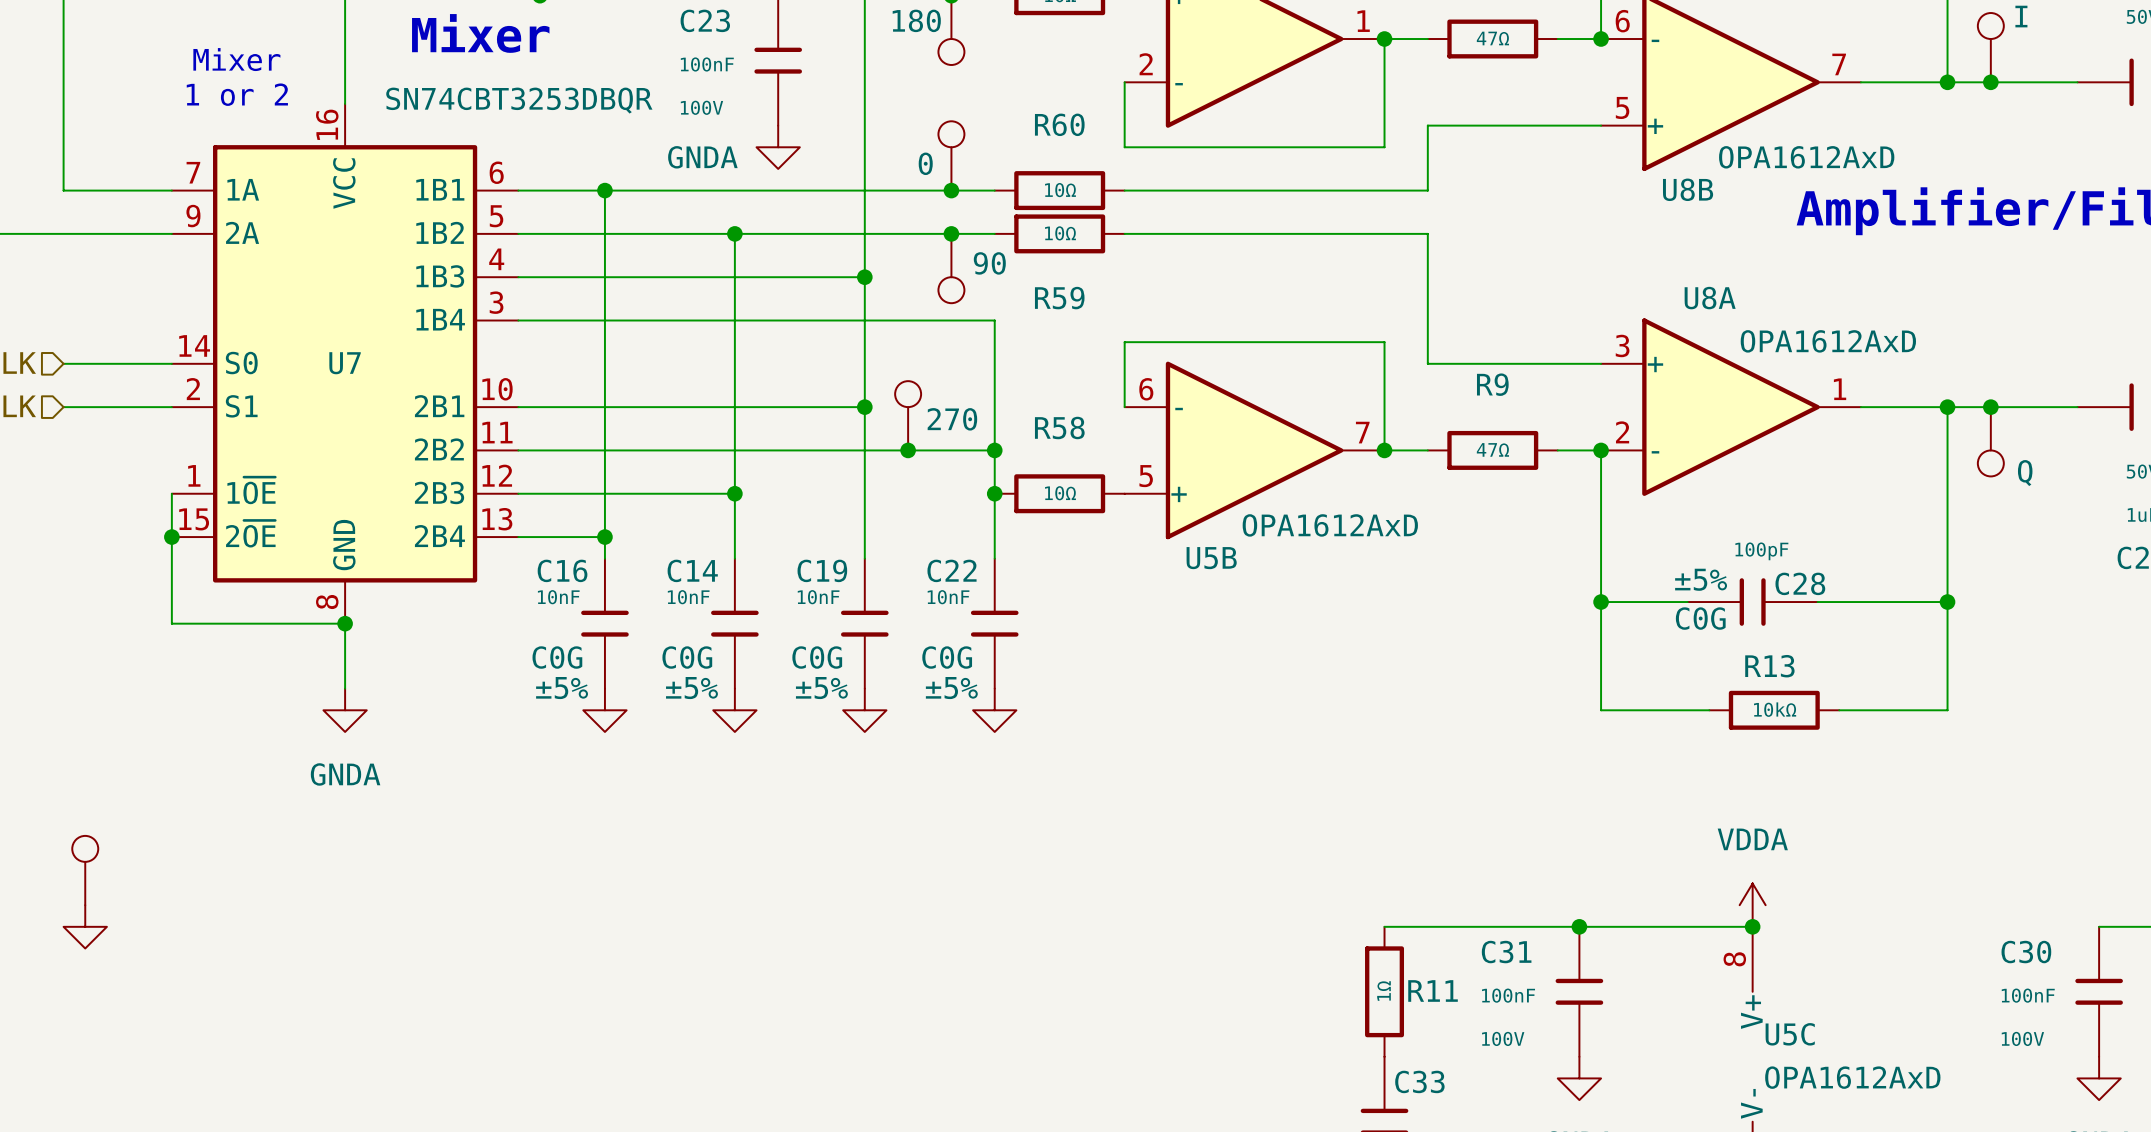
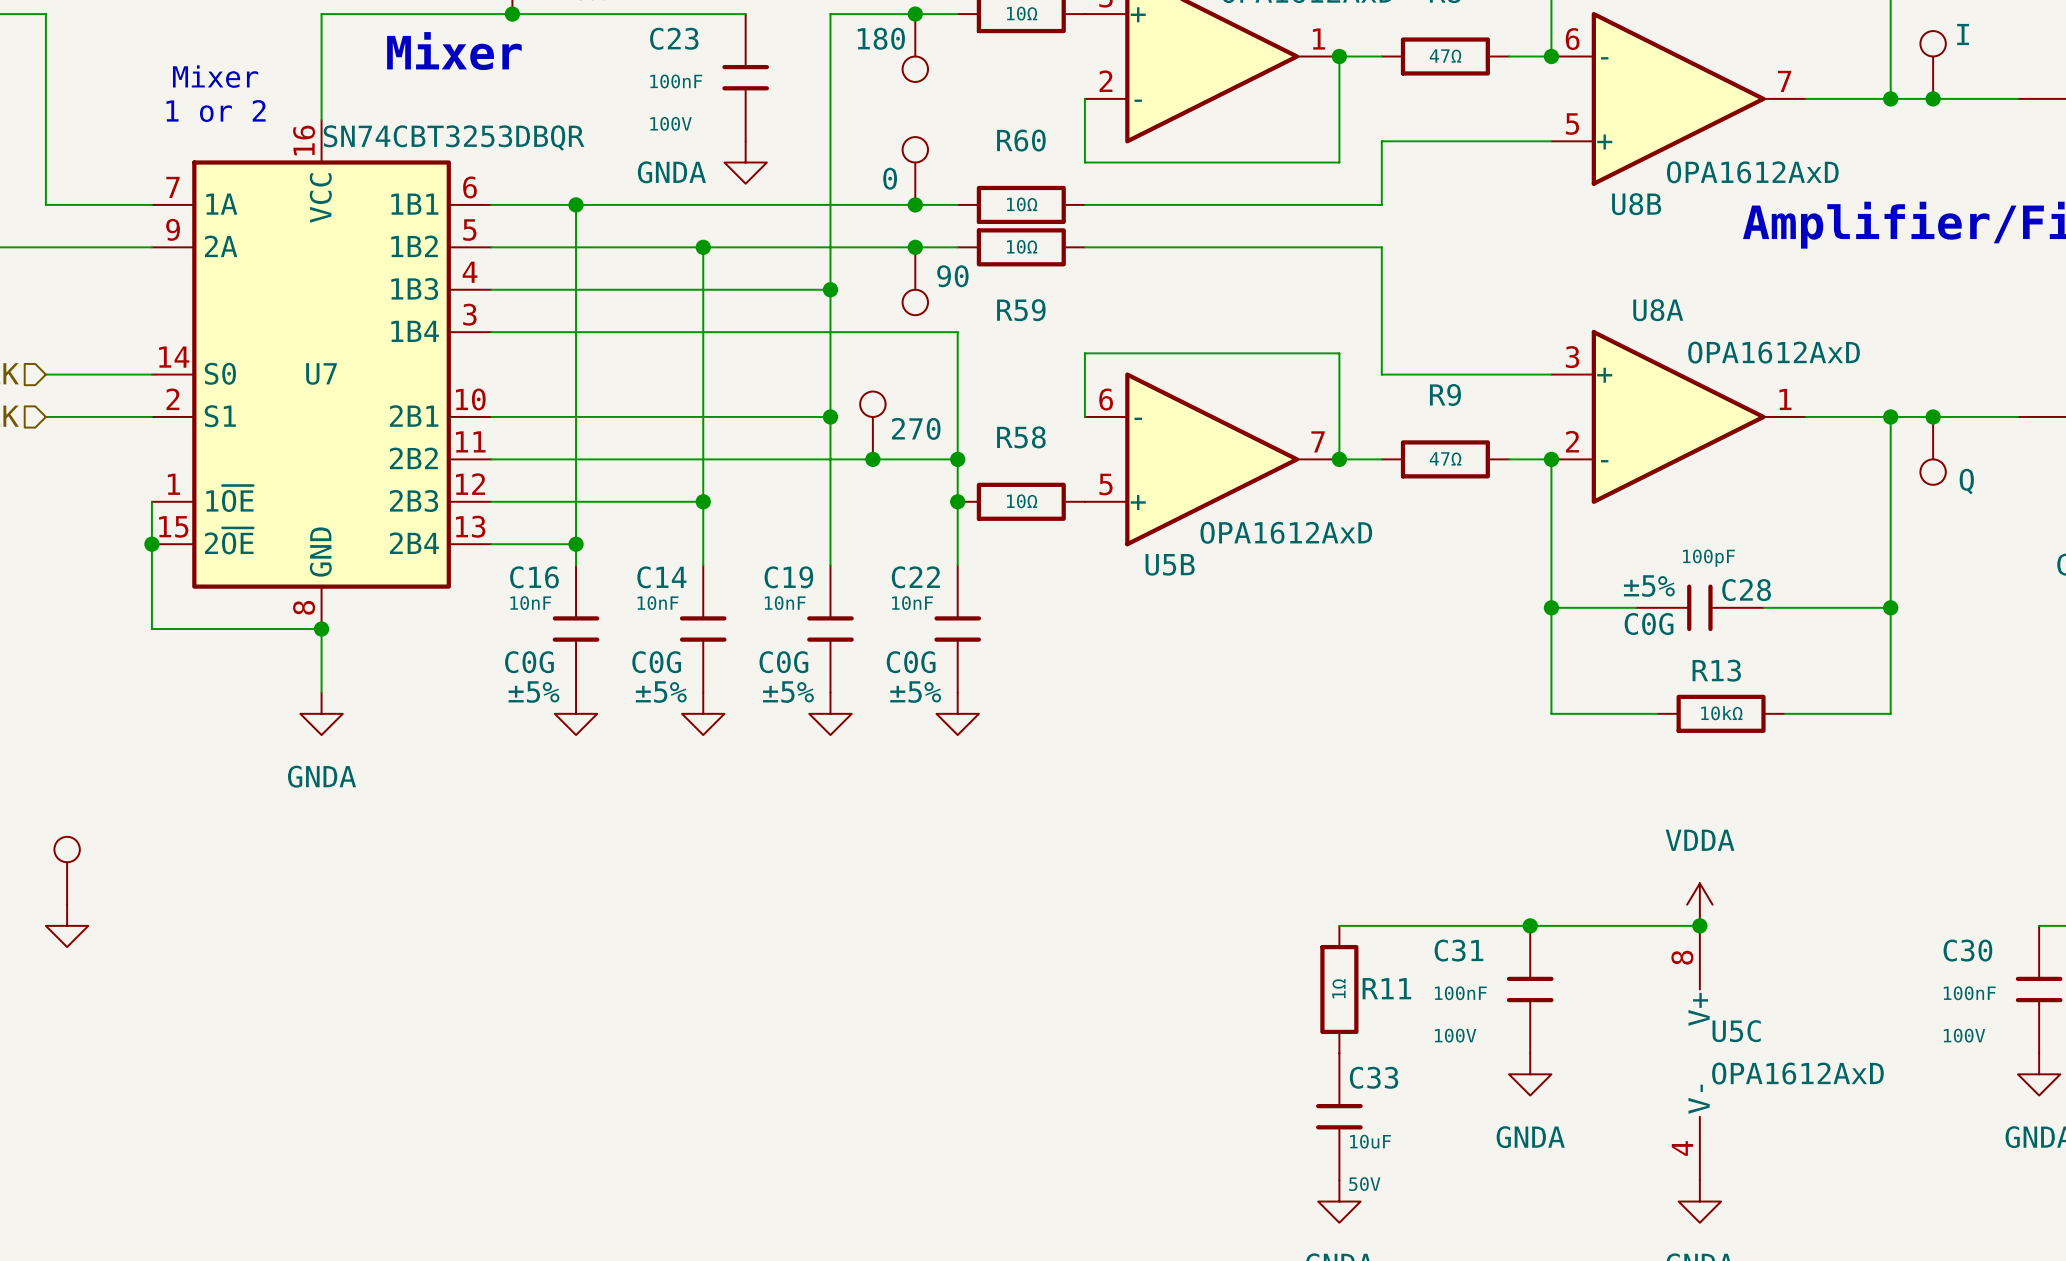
U7 value position: SN74CBT3253DBQR (519, 100) -> SN74CBT3253DBQR (454, 138)

